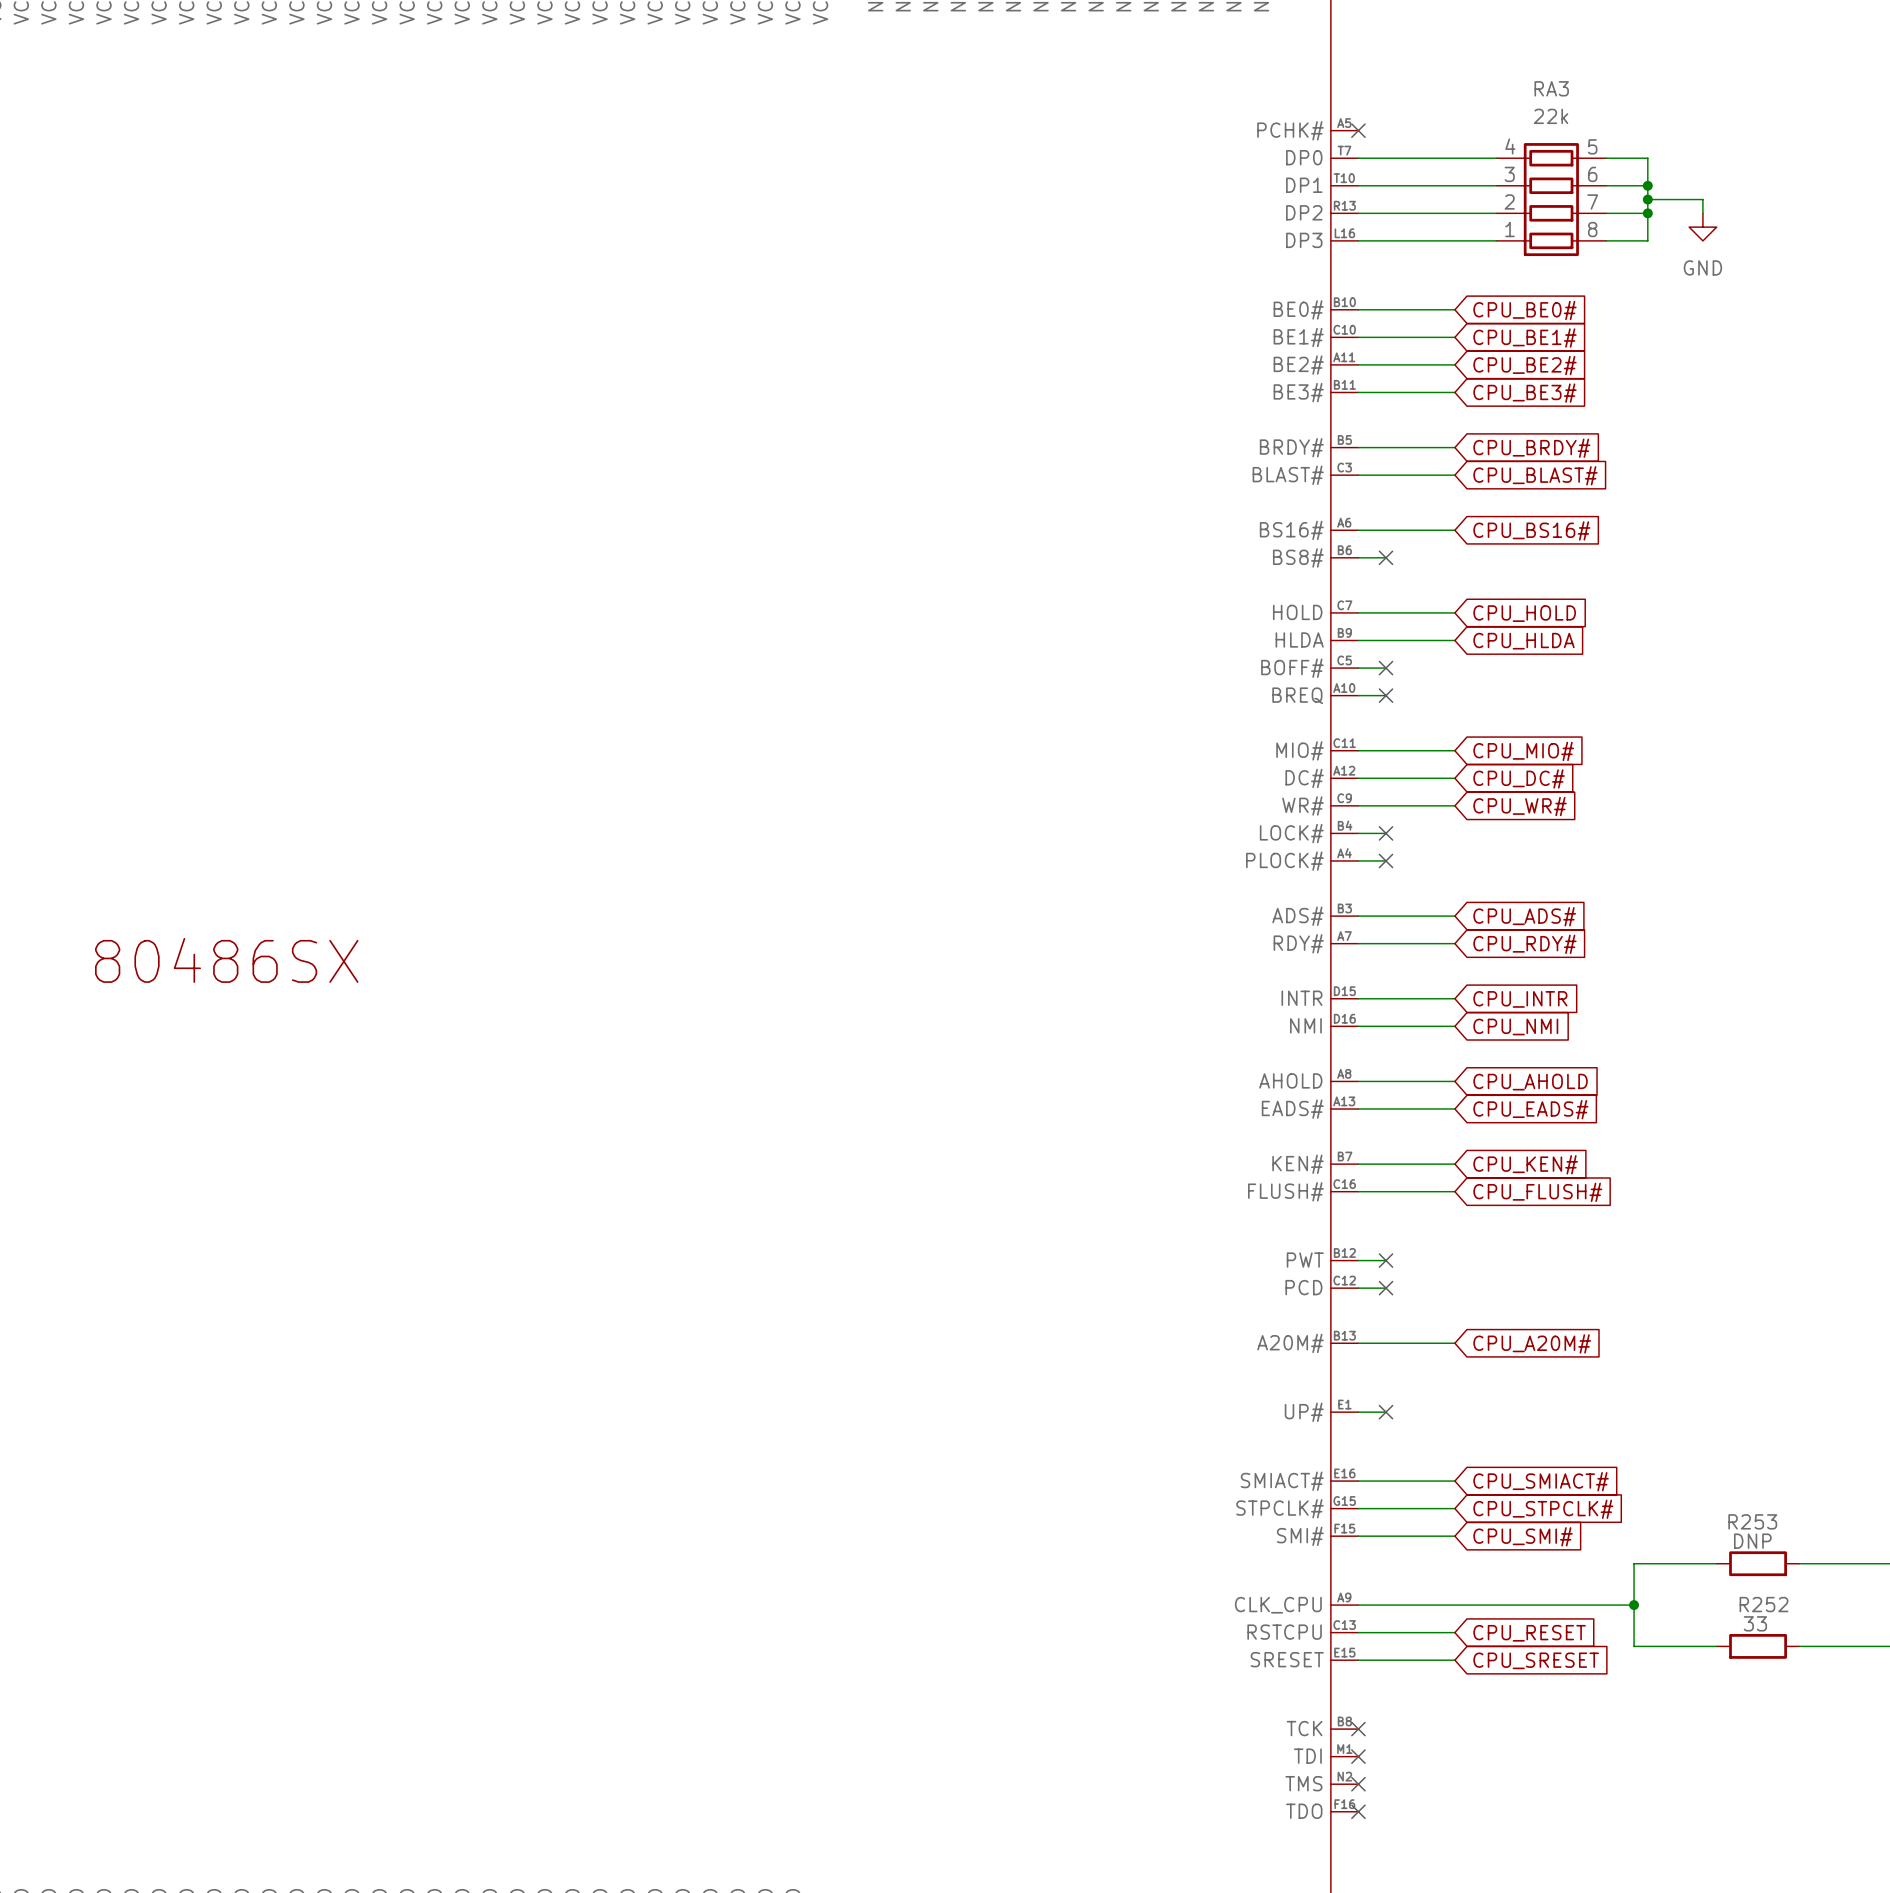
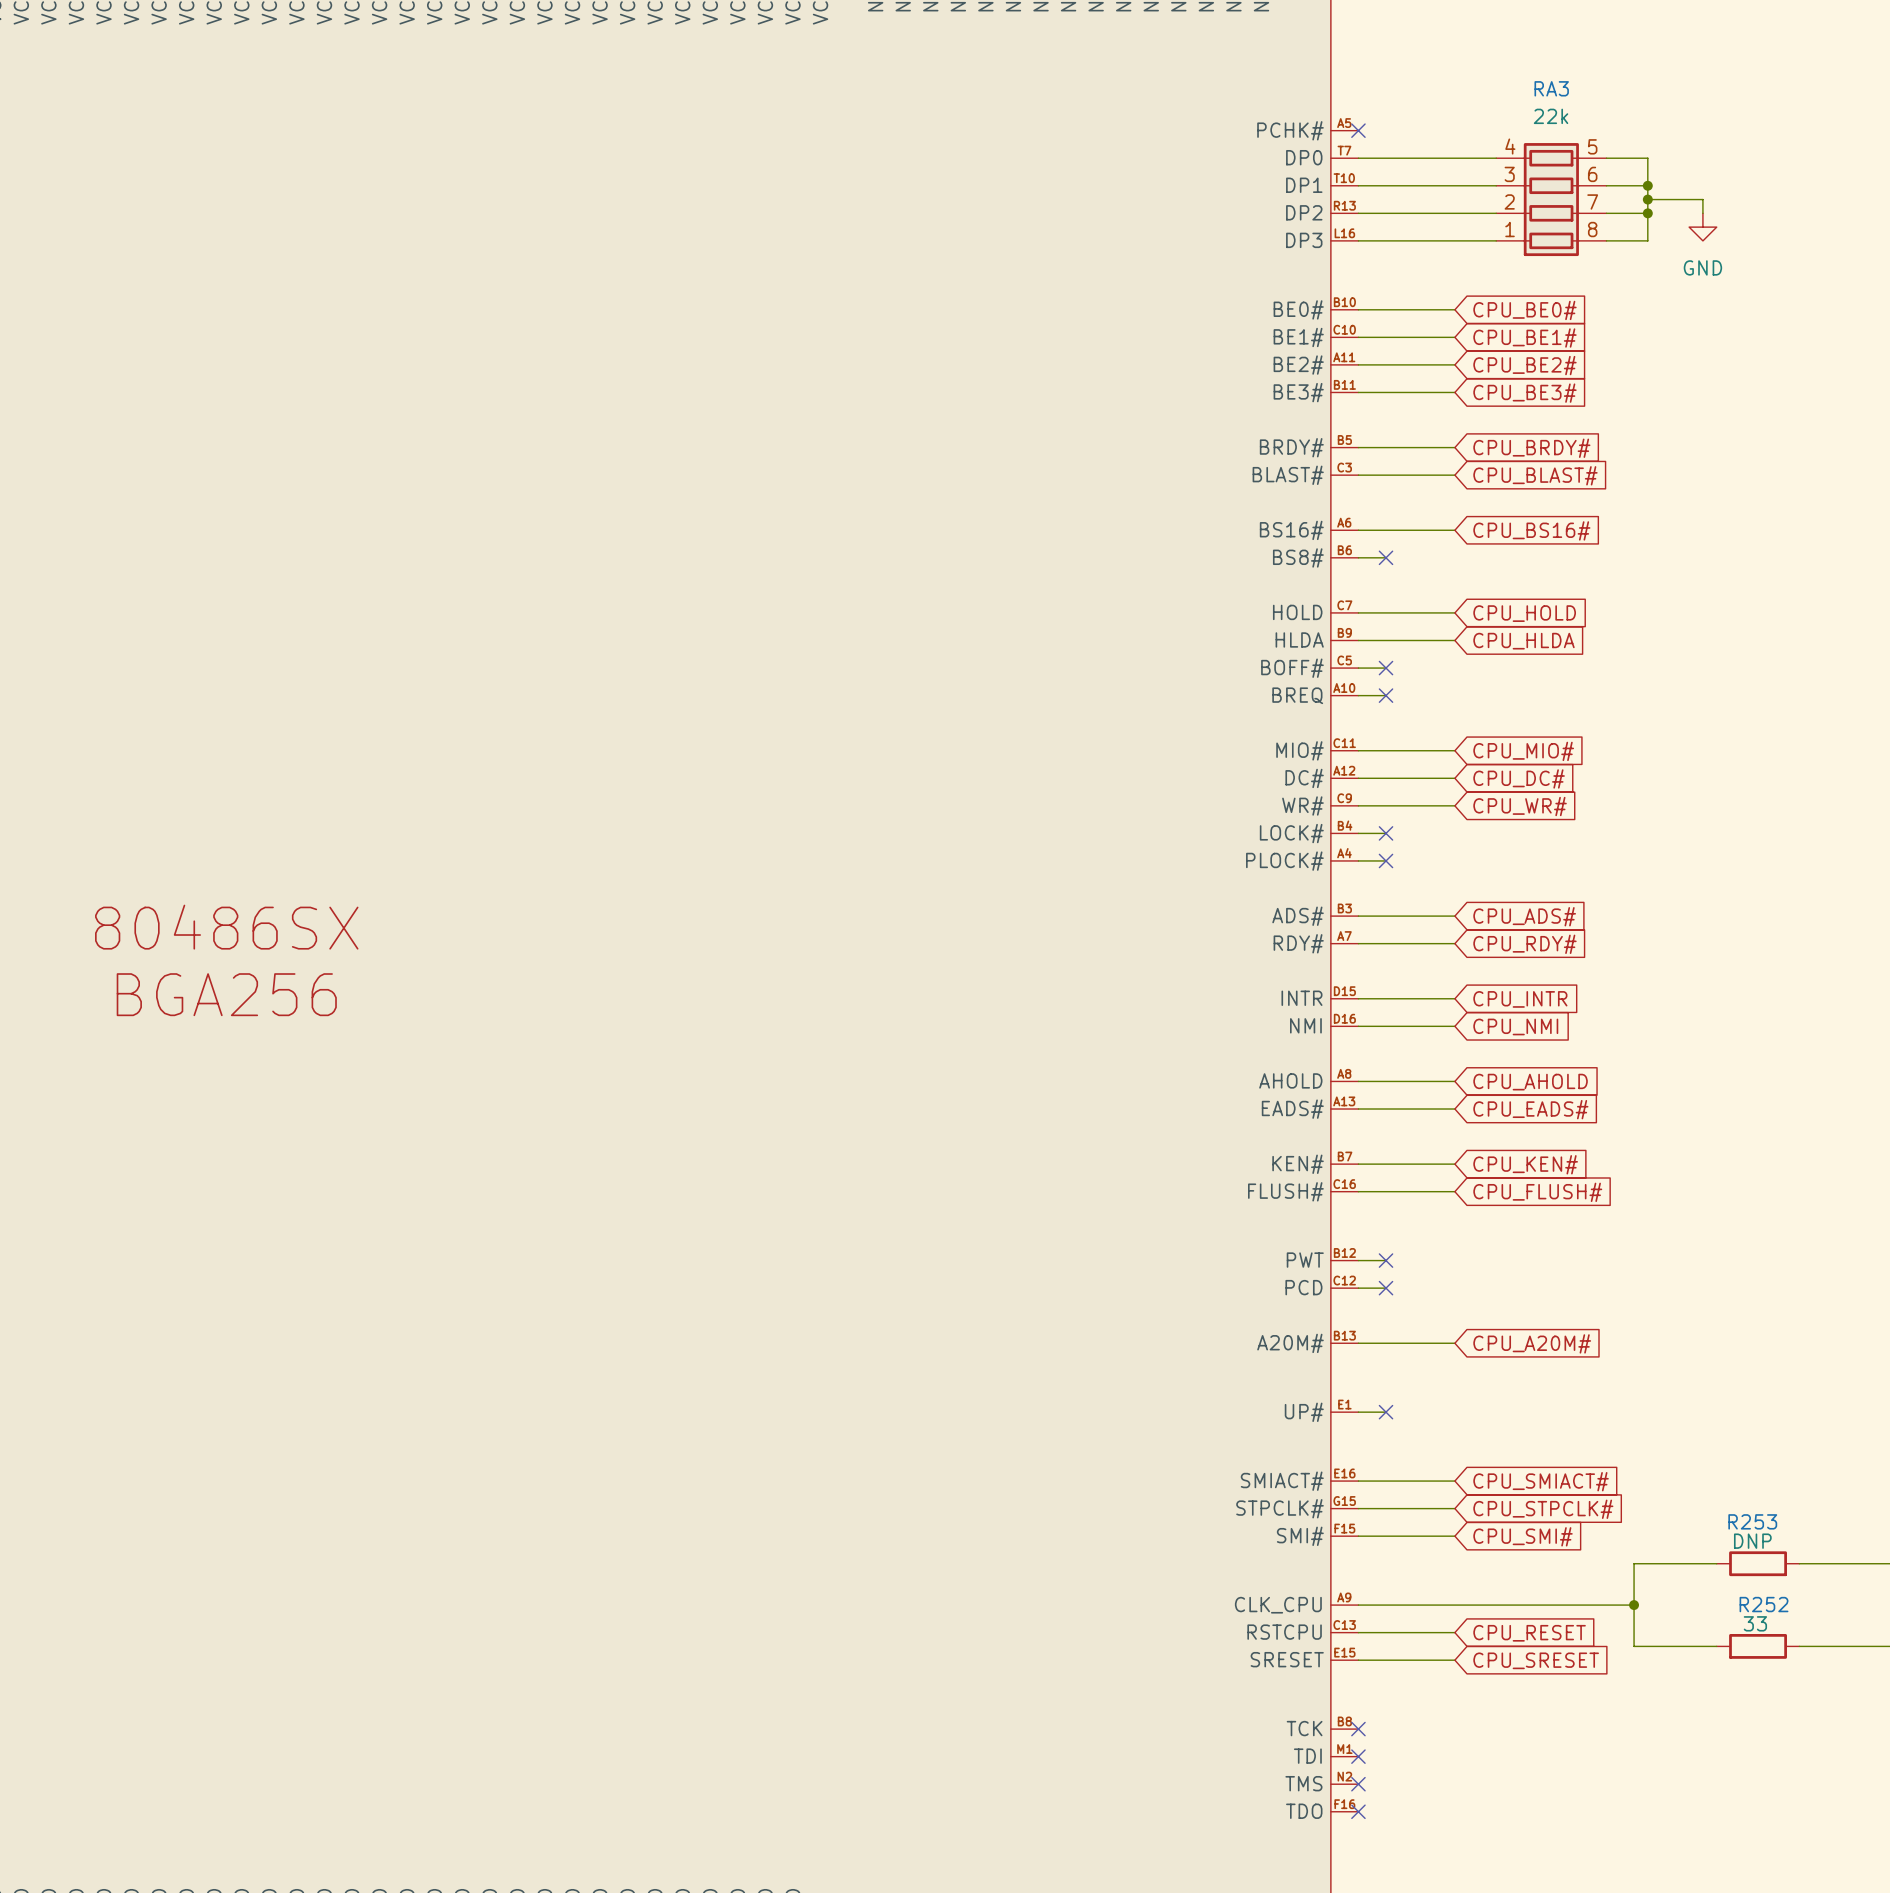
part text position: 80486SX (226, 960) -> 80486SX (226, 927)
part text: none -> BGA256 (226, 994)

